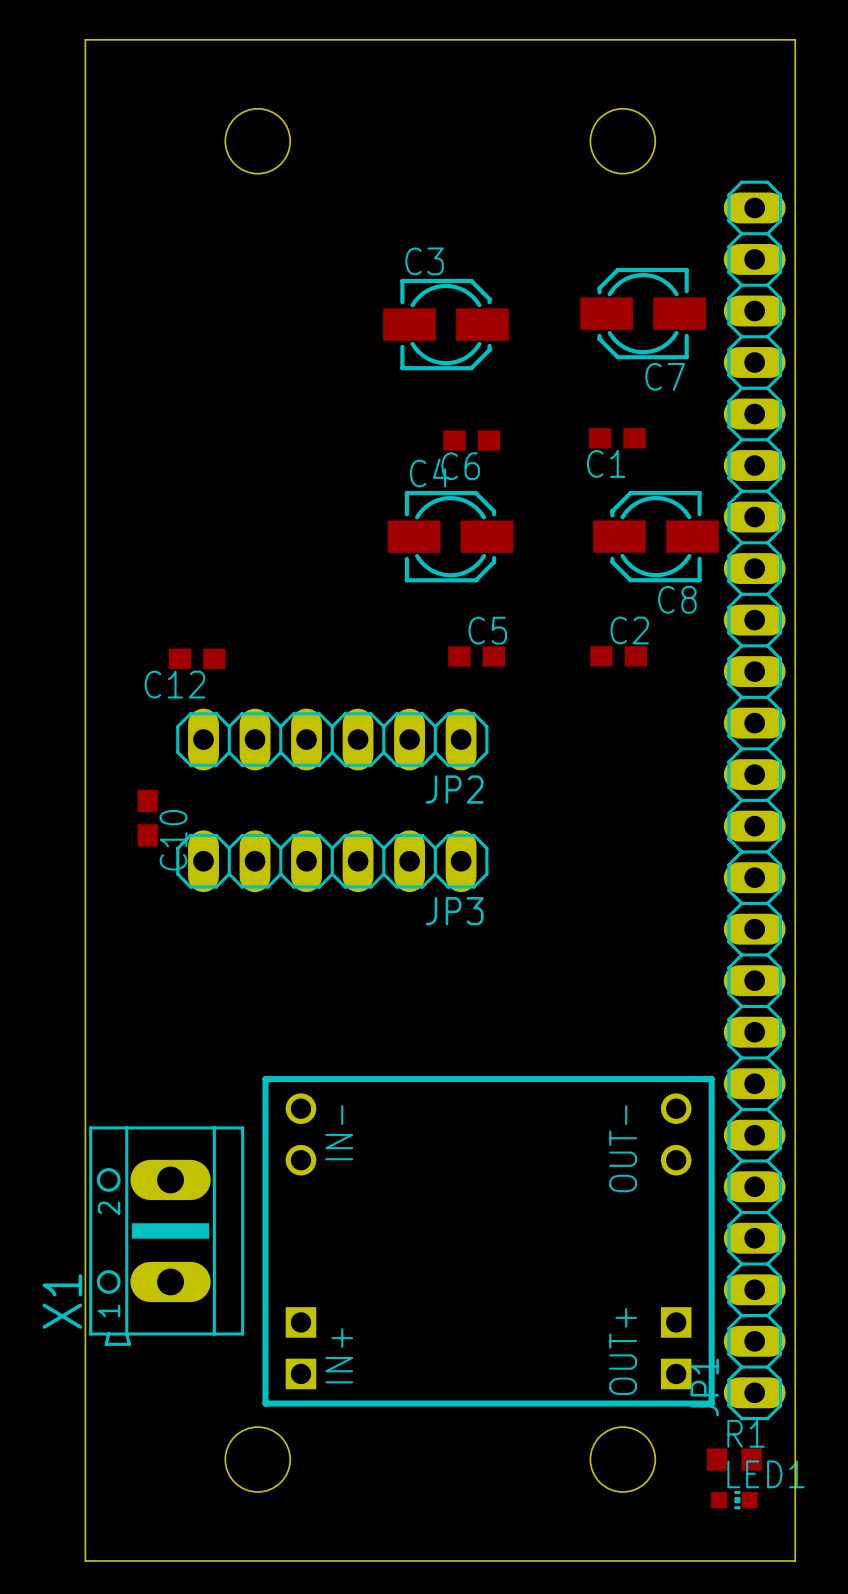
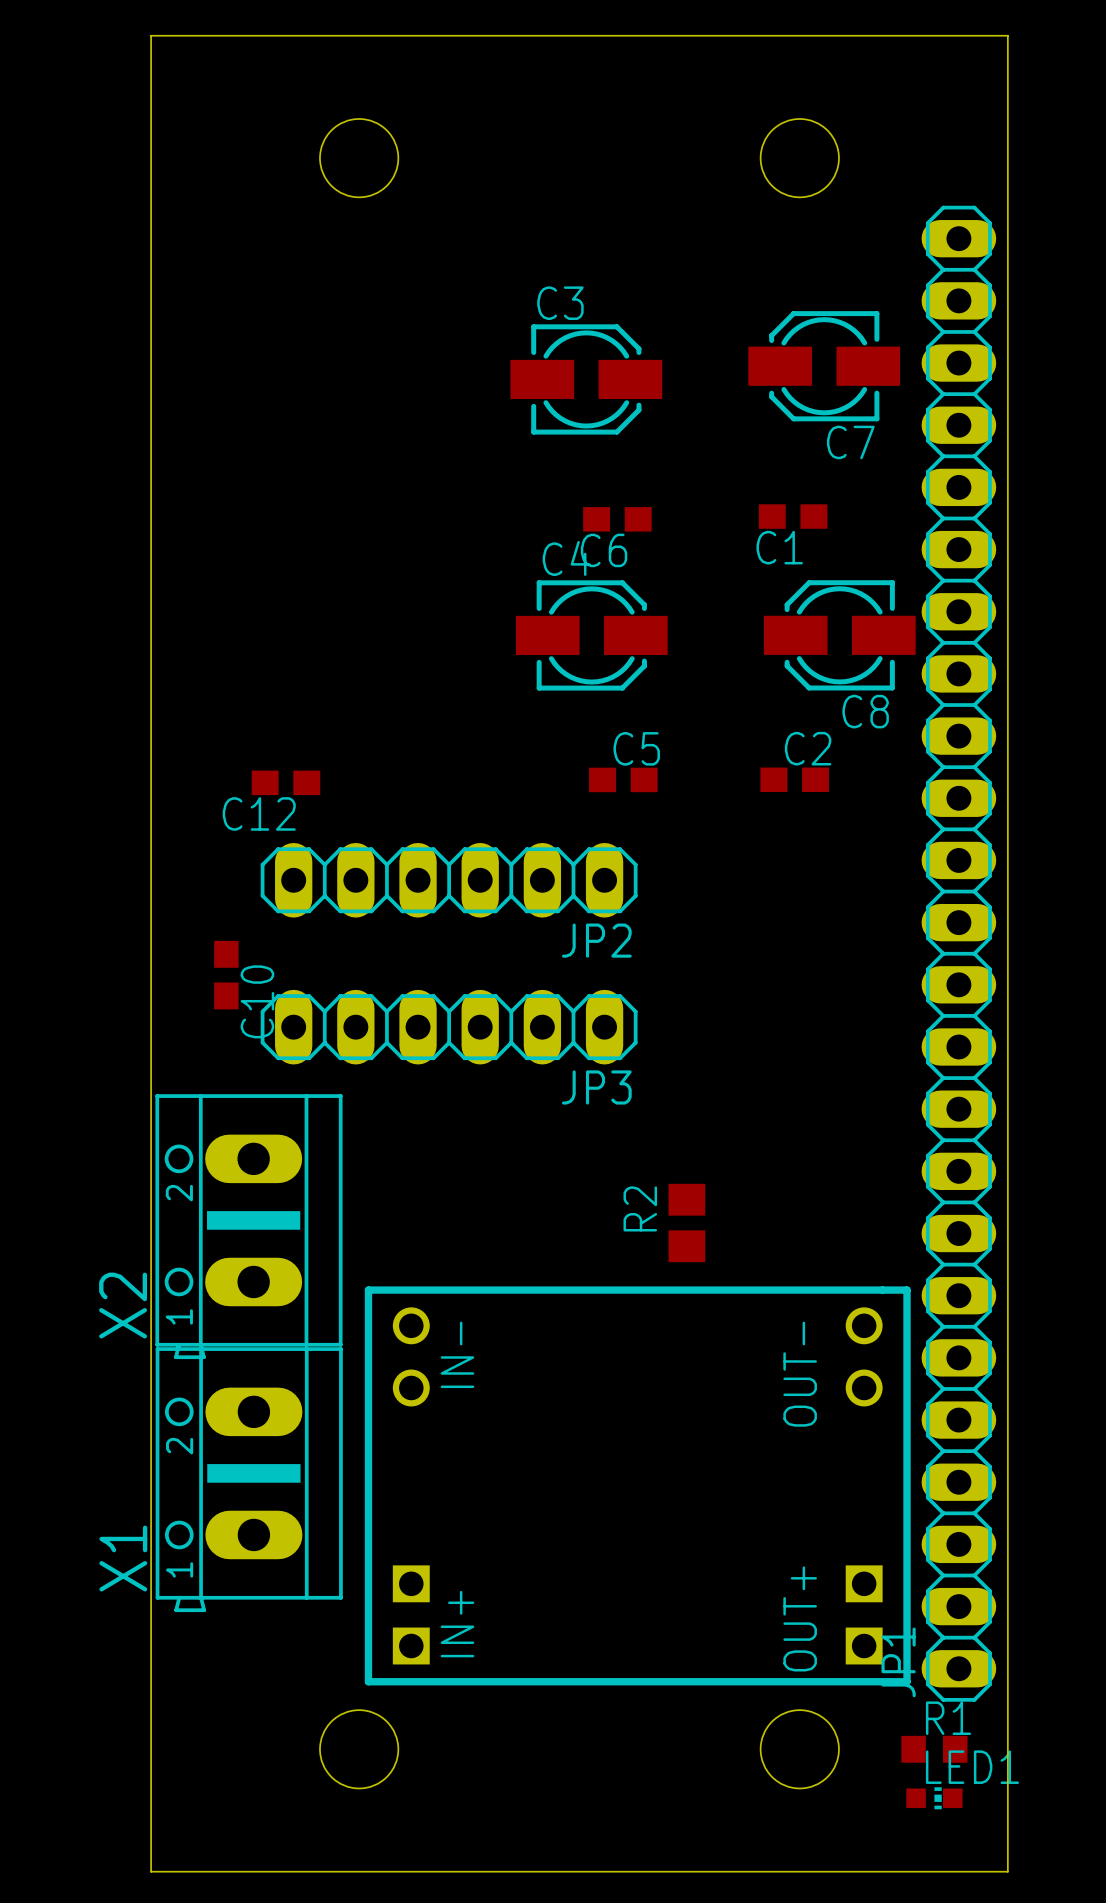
R2: none -> (686, 1223)
X2: none -> (248, 1226)

